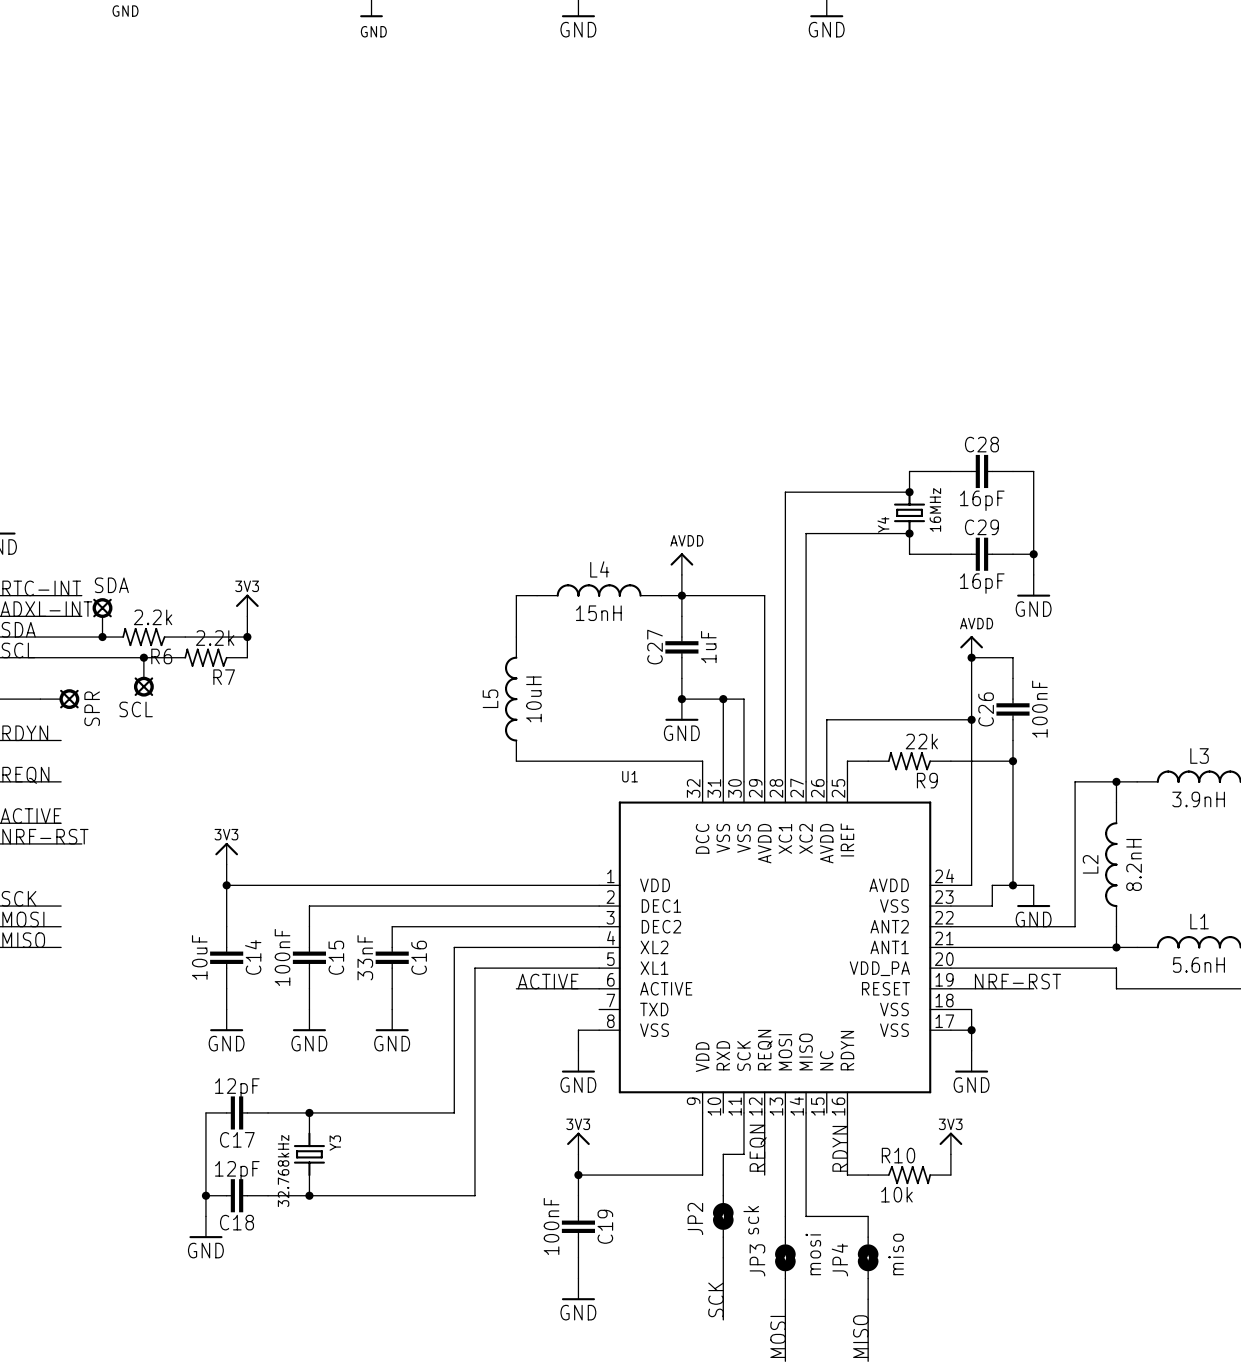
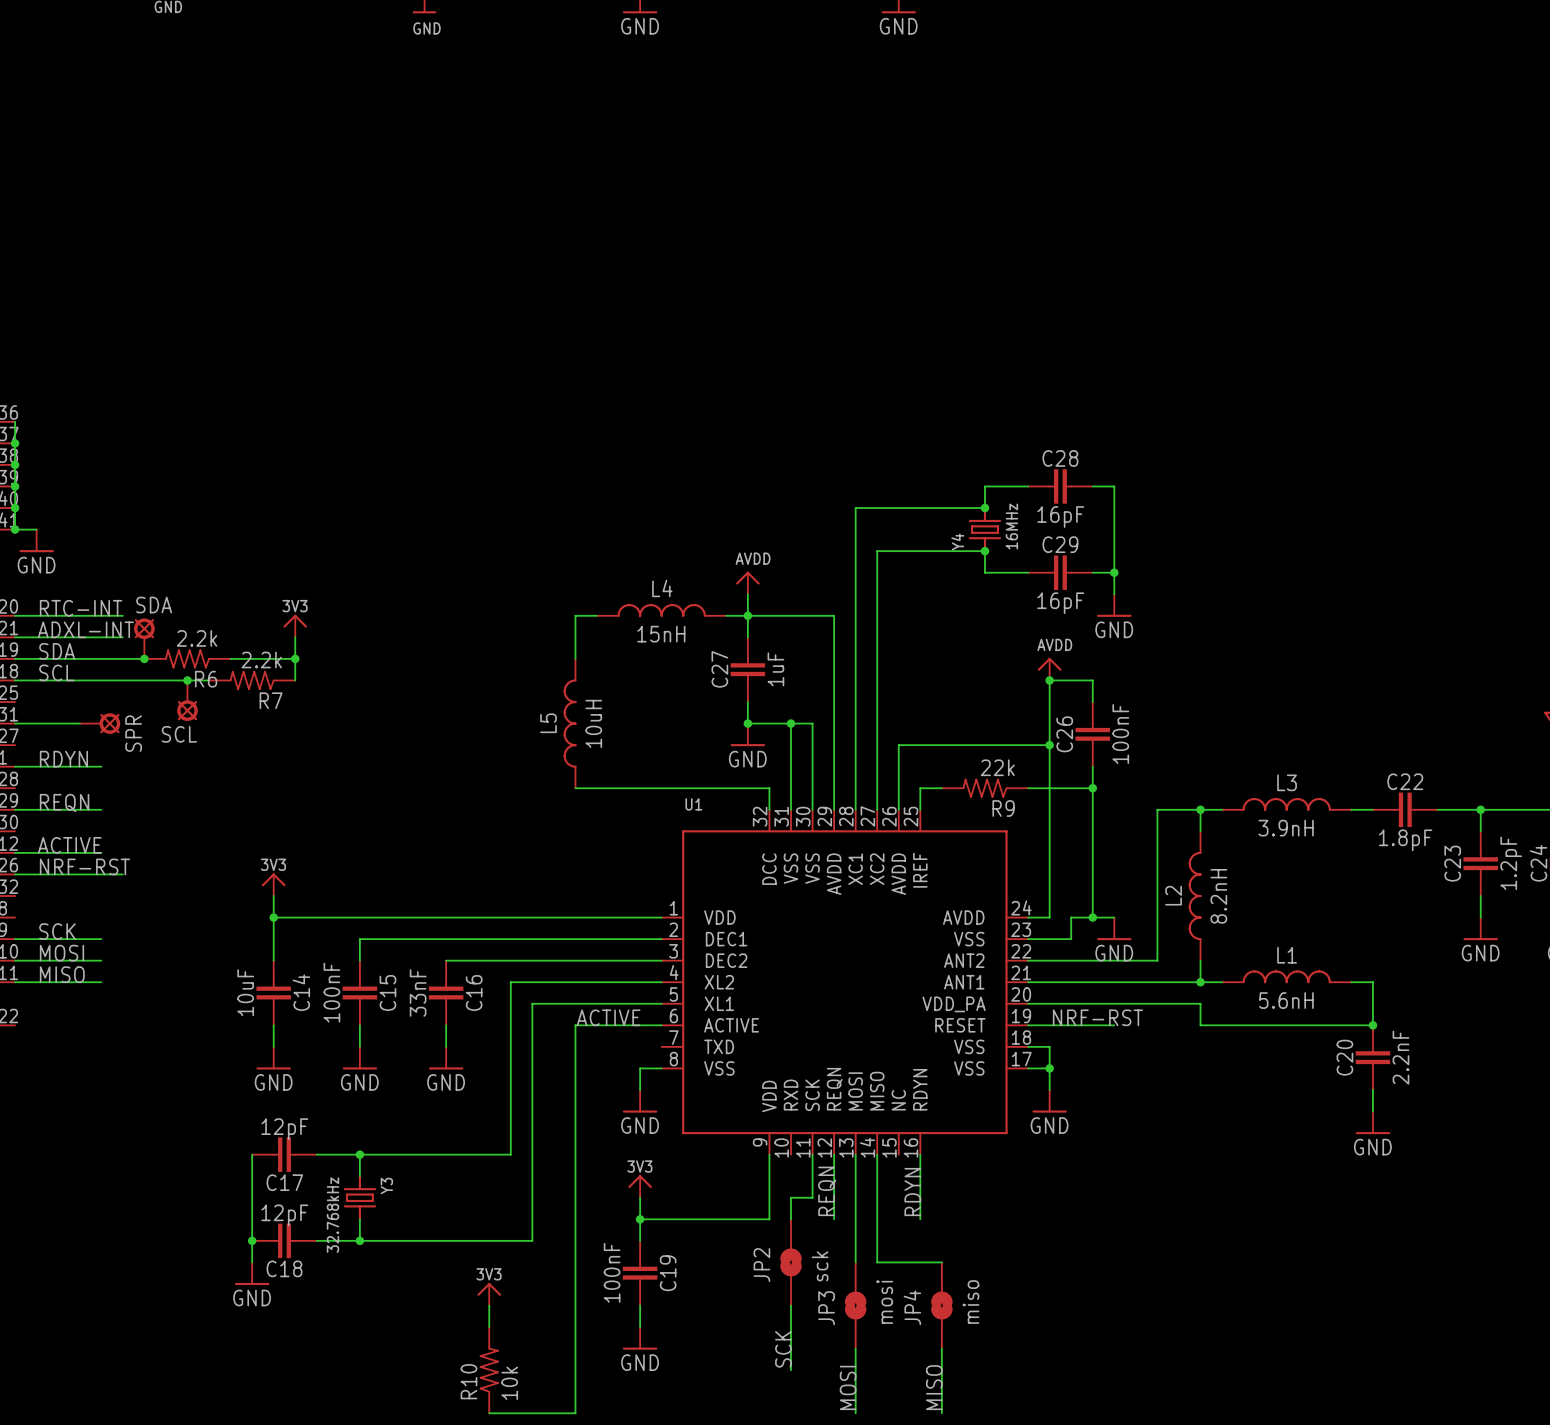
wire: none -> (575, 1025) (575, 1413) (489, 1413)
power symbol: 3V3 (950, 1143) -> none
wire: (950, 1154) (950, 1175) -> none
wire: (847, 1175) (868, 1175) -> none
R10 rotation: 0° (909, 1175) -> 90° counterclockwise (489, 1370)
R10 position: (909, 1175) -> (489, 1370)
power symbol: none -> 3V3 (489, 1294)
wire: none -> (489, 1305) (489, 1327)

